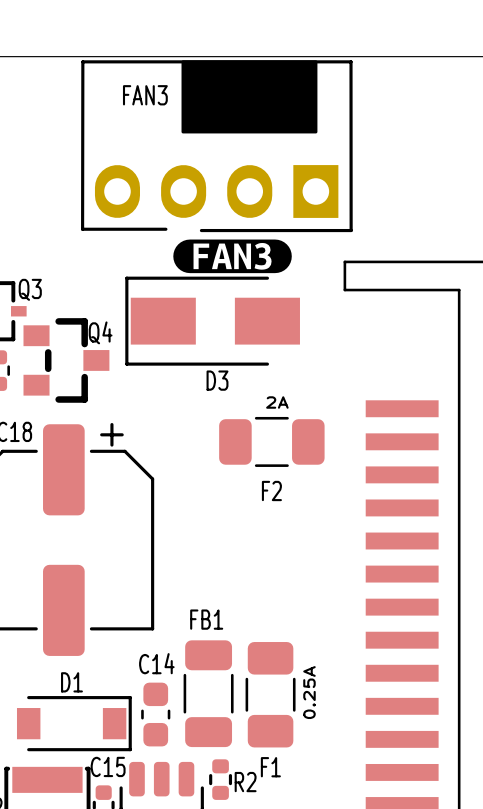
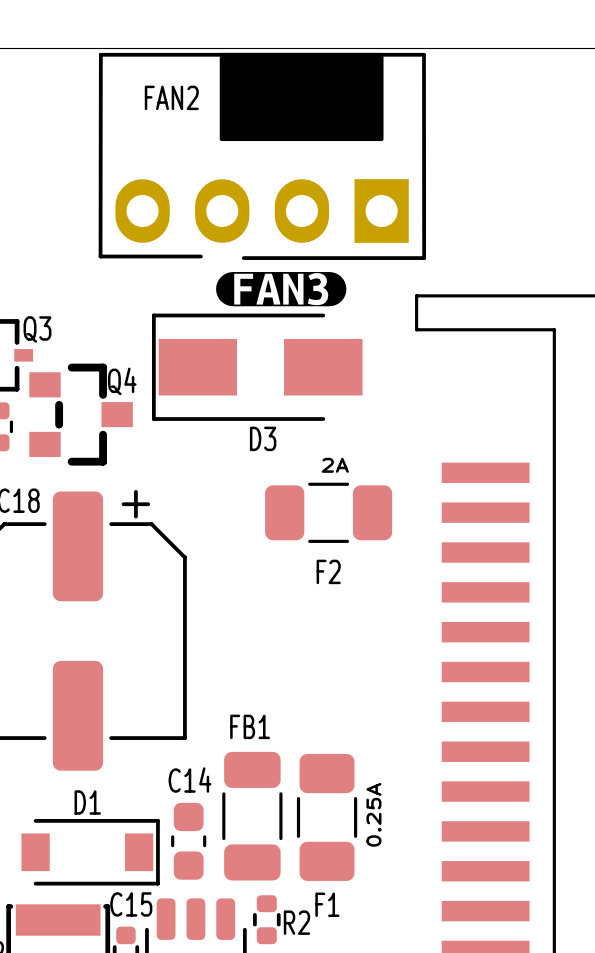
FAN3 name: FAN3 (145, 95) -> FAN2 (171, 97)
drawing shape: [173, 239, 292, 274] -> [216, 272, 347, 307]

